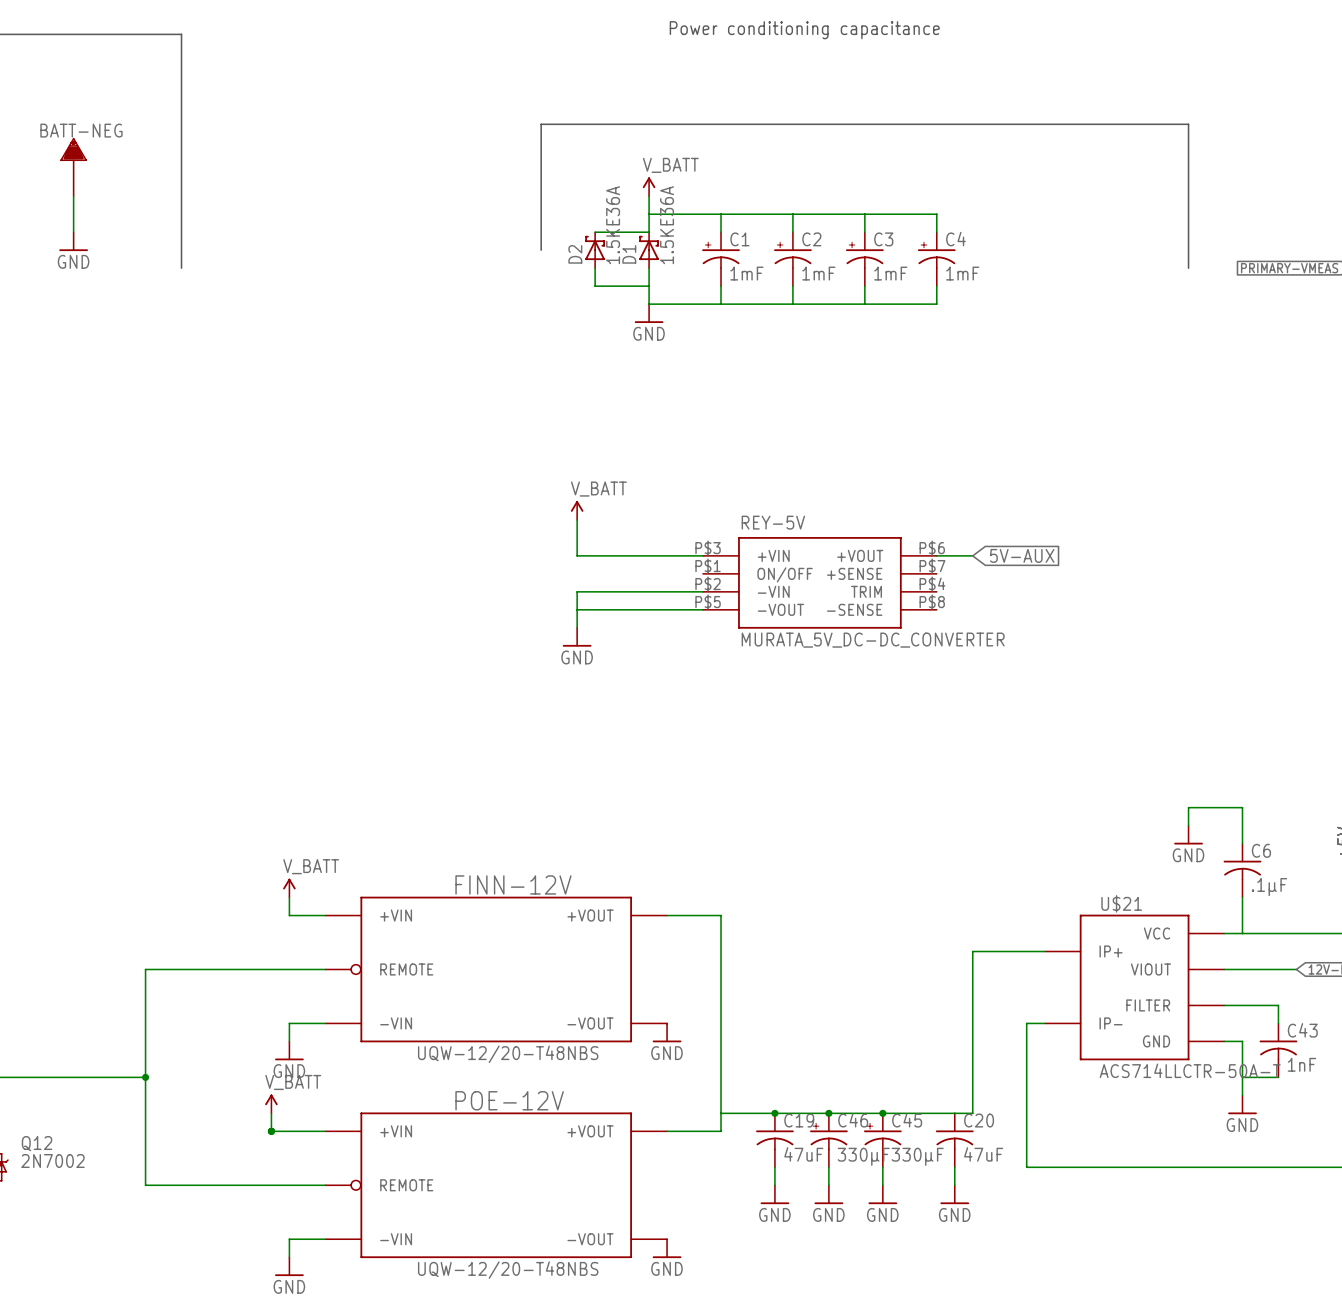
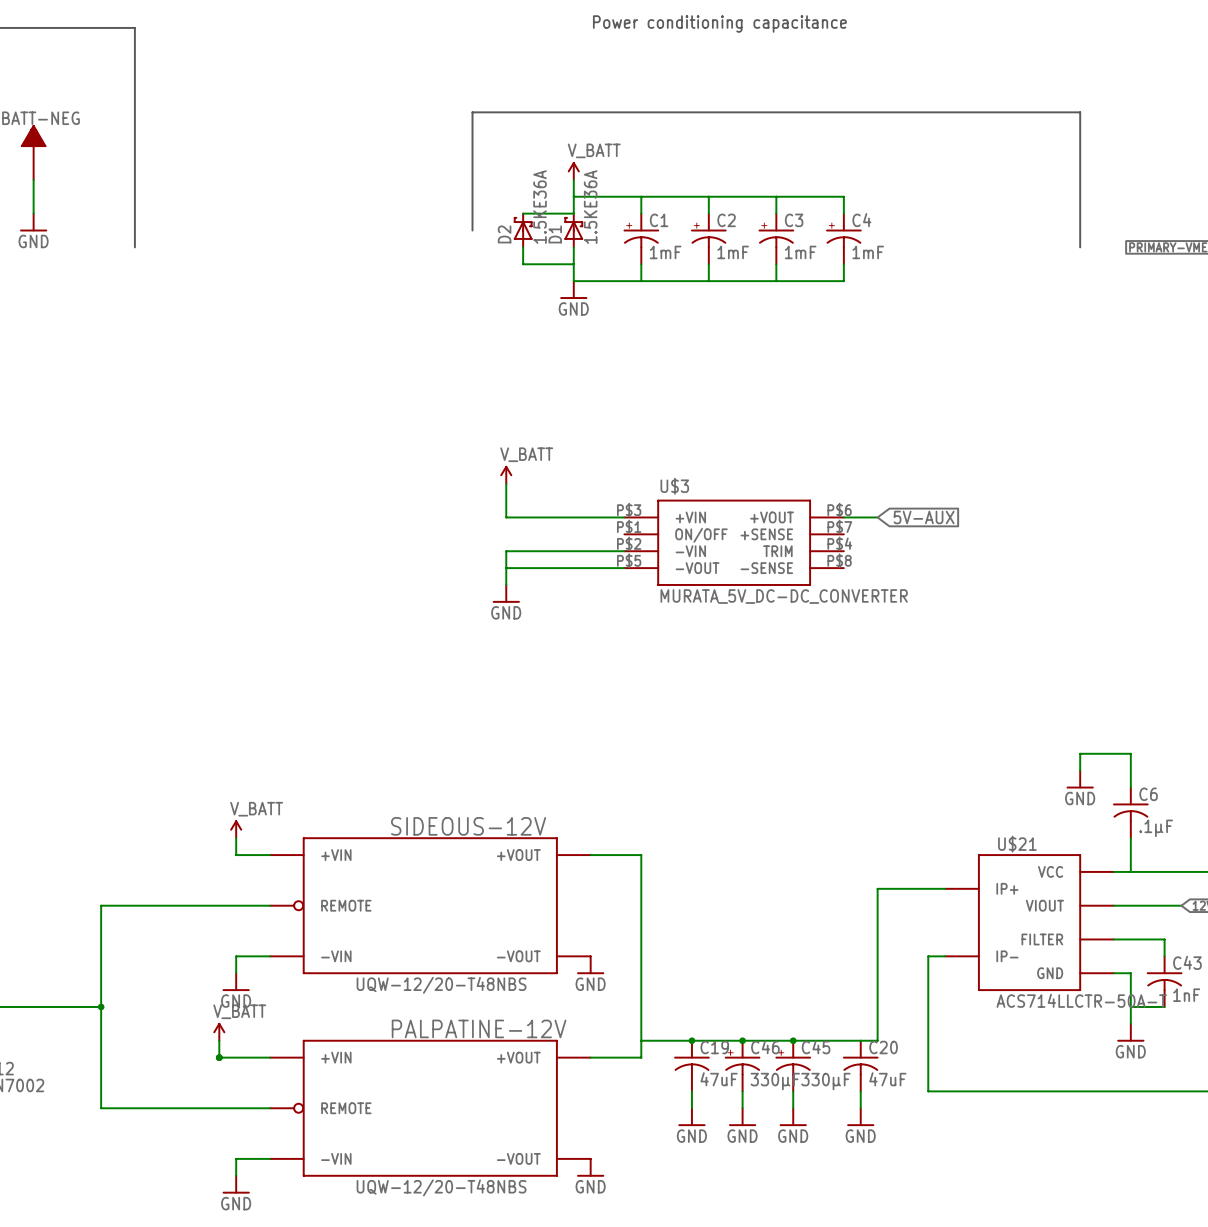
REY-5V name: REY-5V (773, 522) -> U$3 (674, 486)
FINN-12V name: FINN-12V (513, 884) -> SIDEOUS-12V (468, 826)
POE-12V name: POE-12V (509, 1100) -> PALPATINE-12V (479, 1028)

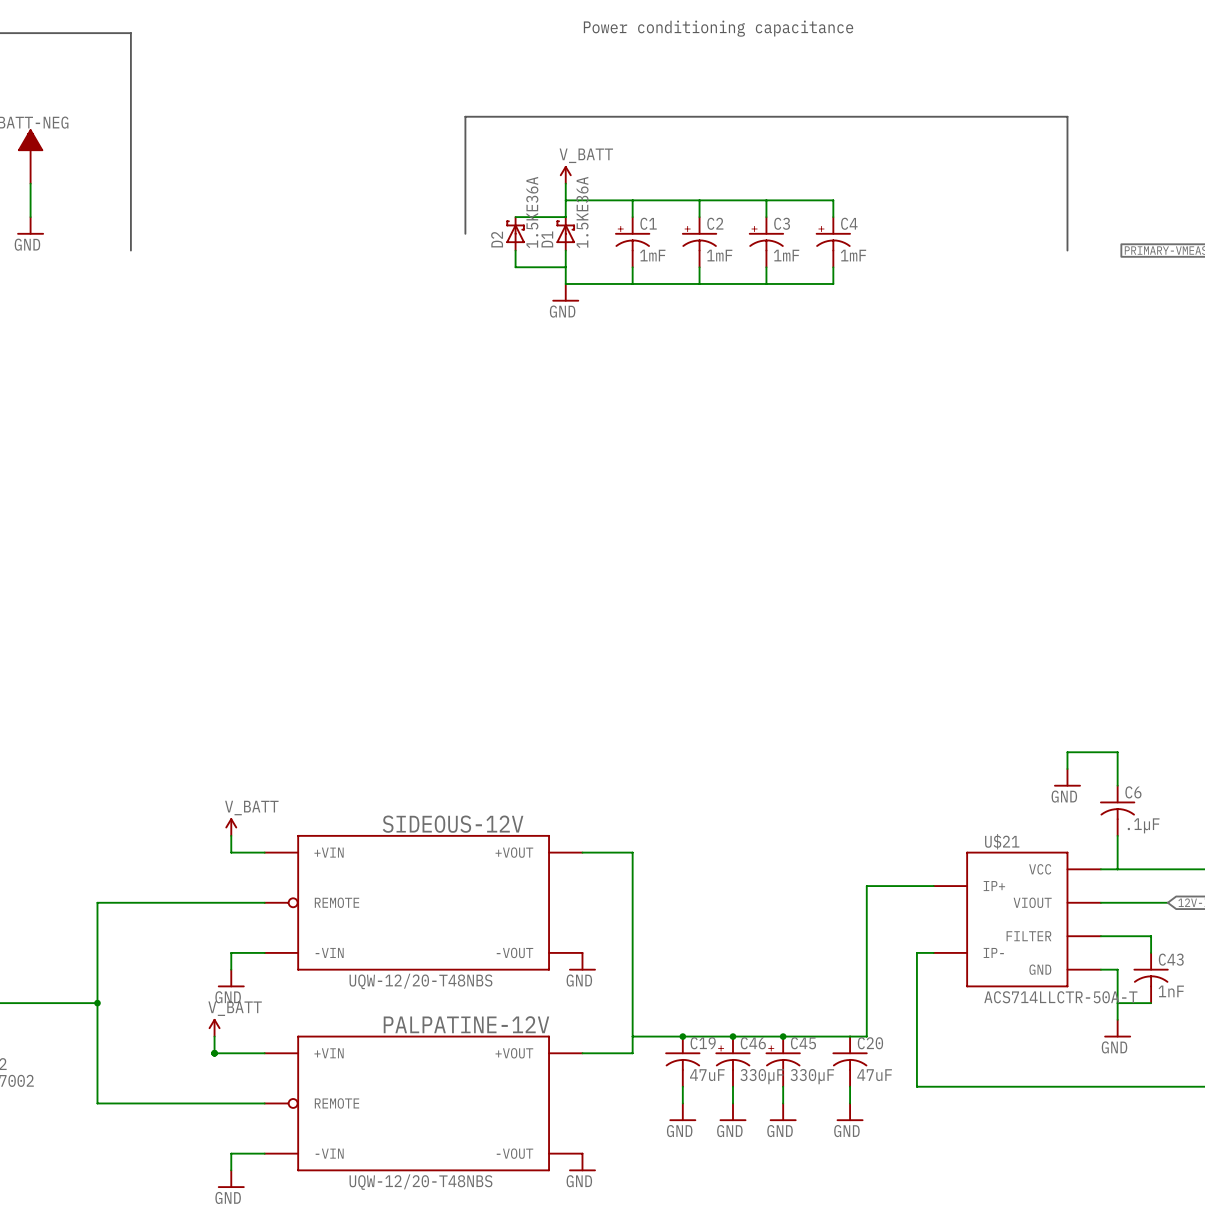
power symbol: V_BATT (506, 474) -> none
wire: (506, 483) (506, 517) (624, 517) -> none
wire: (843, 517) (877, 517) -> none
global label: 5V-AUX (924, 517) -> none
U$3: MURATA_5V_DC-DC_CONVERTER (734, 542) -> none
wire: (624, 551) (506, 551) (506, 584) -> none
wire: (506, 568) (624, 568) -> none
power symbol: GND (506, 593) -> none

